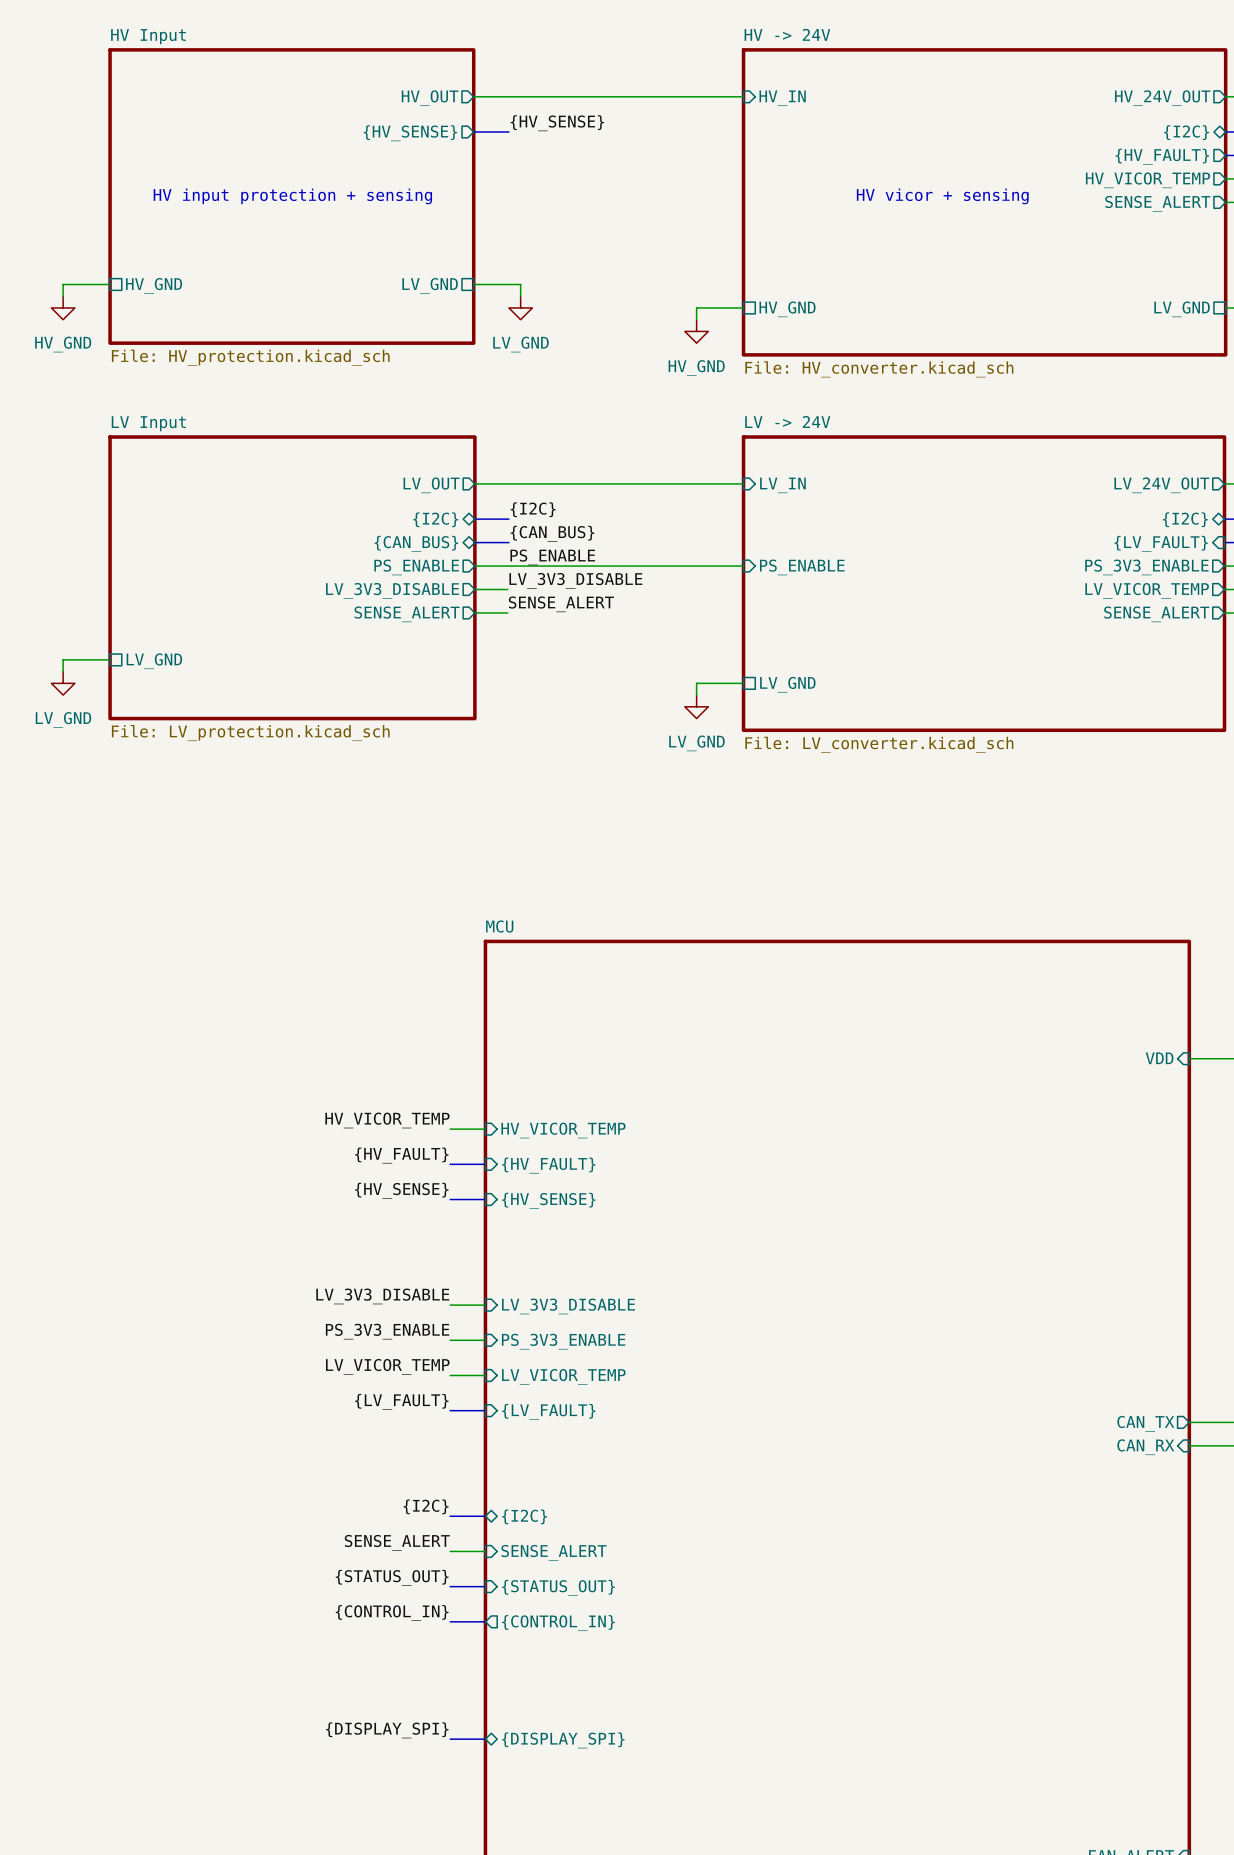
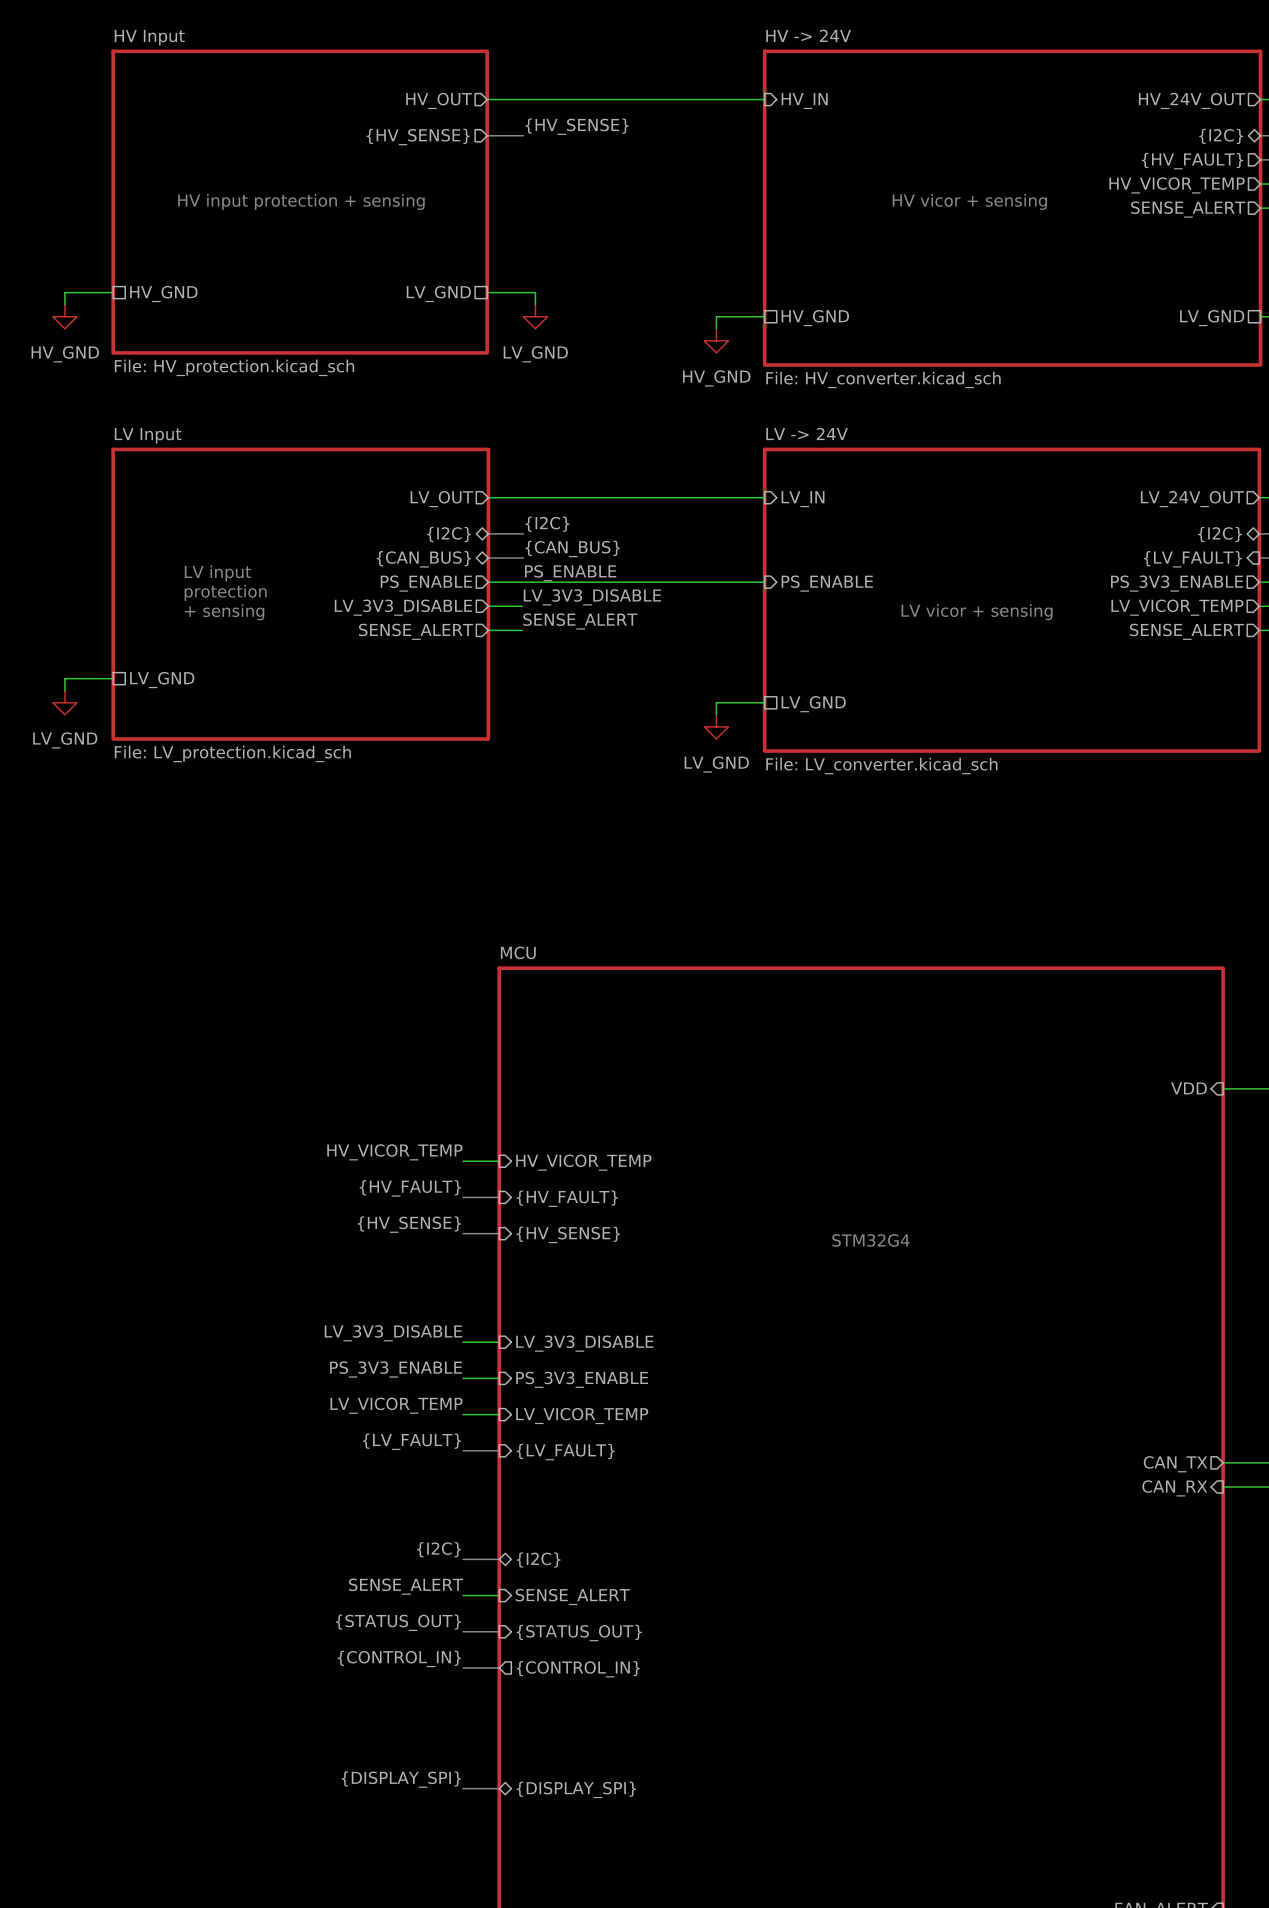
text: none -> LV input (217, 573)
text: none -> protection (225, 592)
text: none -> + sensing (224, 612)
text: none -> LV vicor + sensing (977, 612)
text: none -> STM32G4 (870, 1240)

